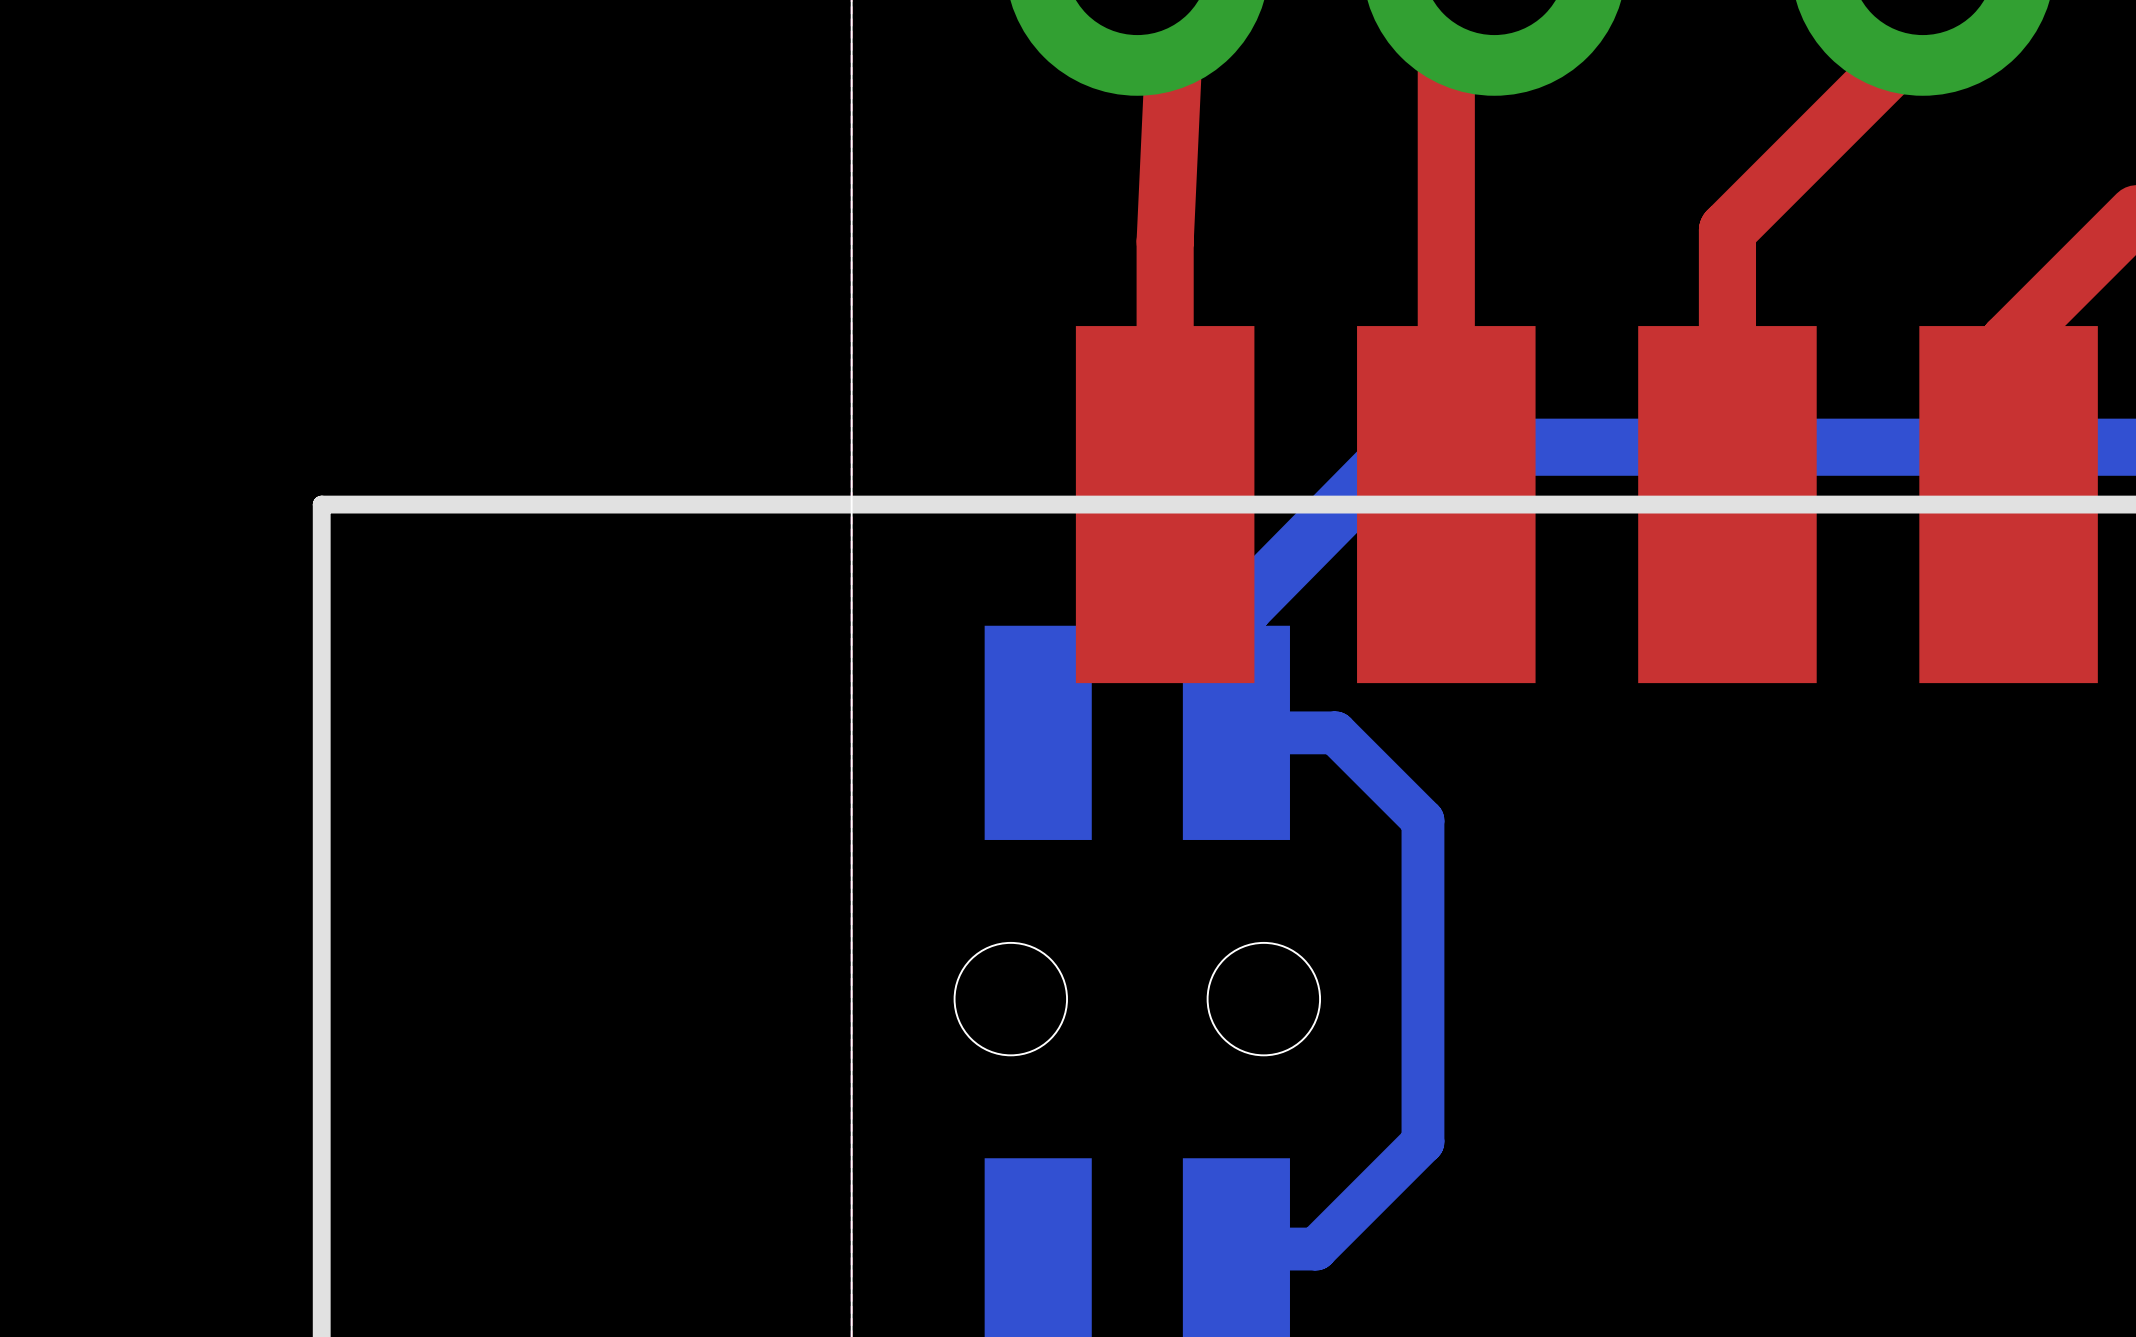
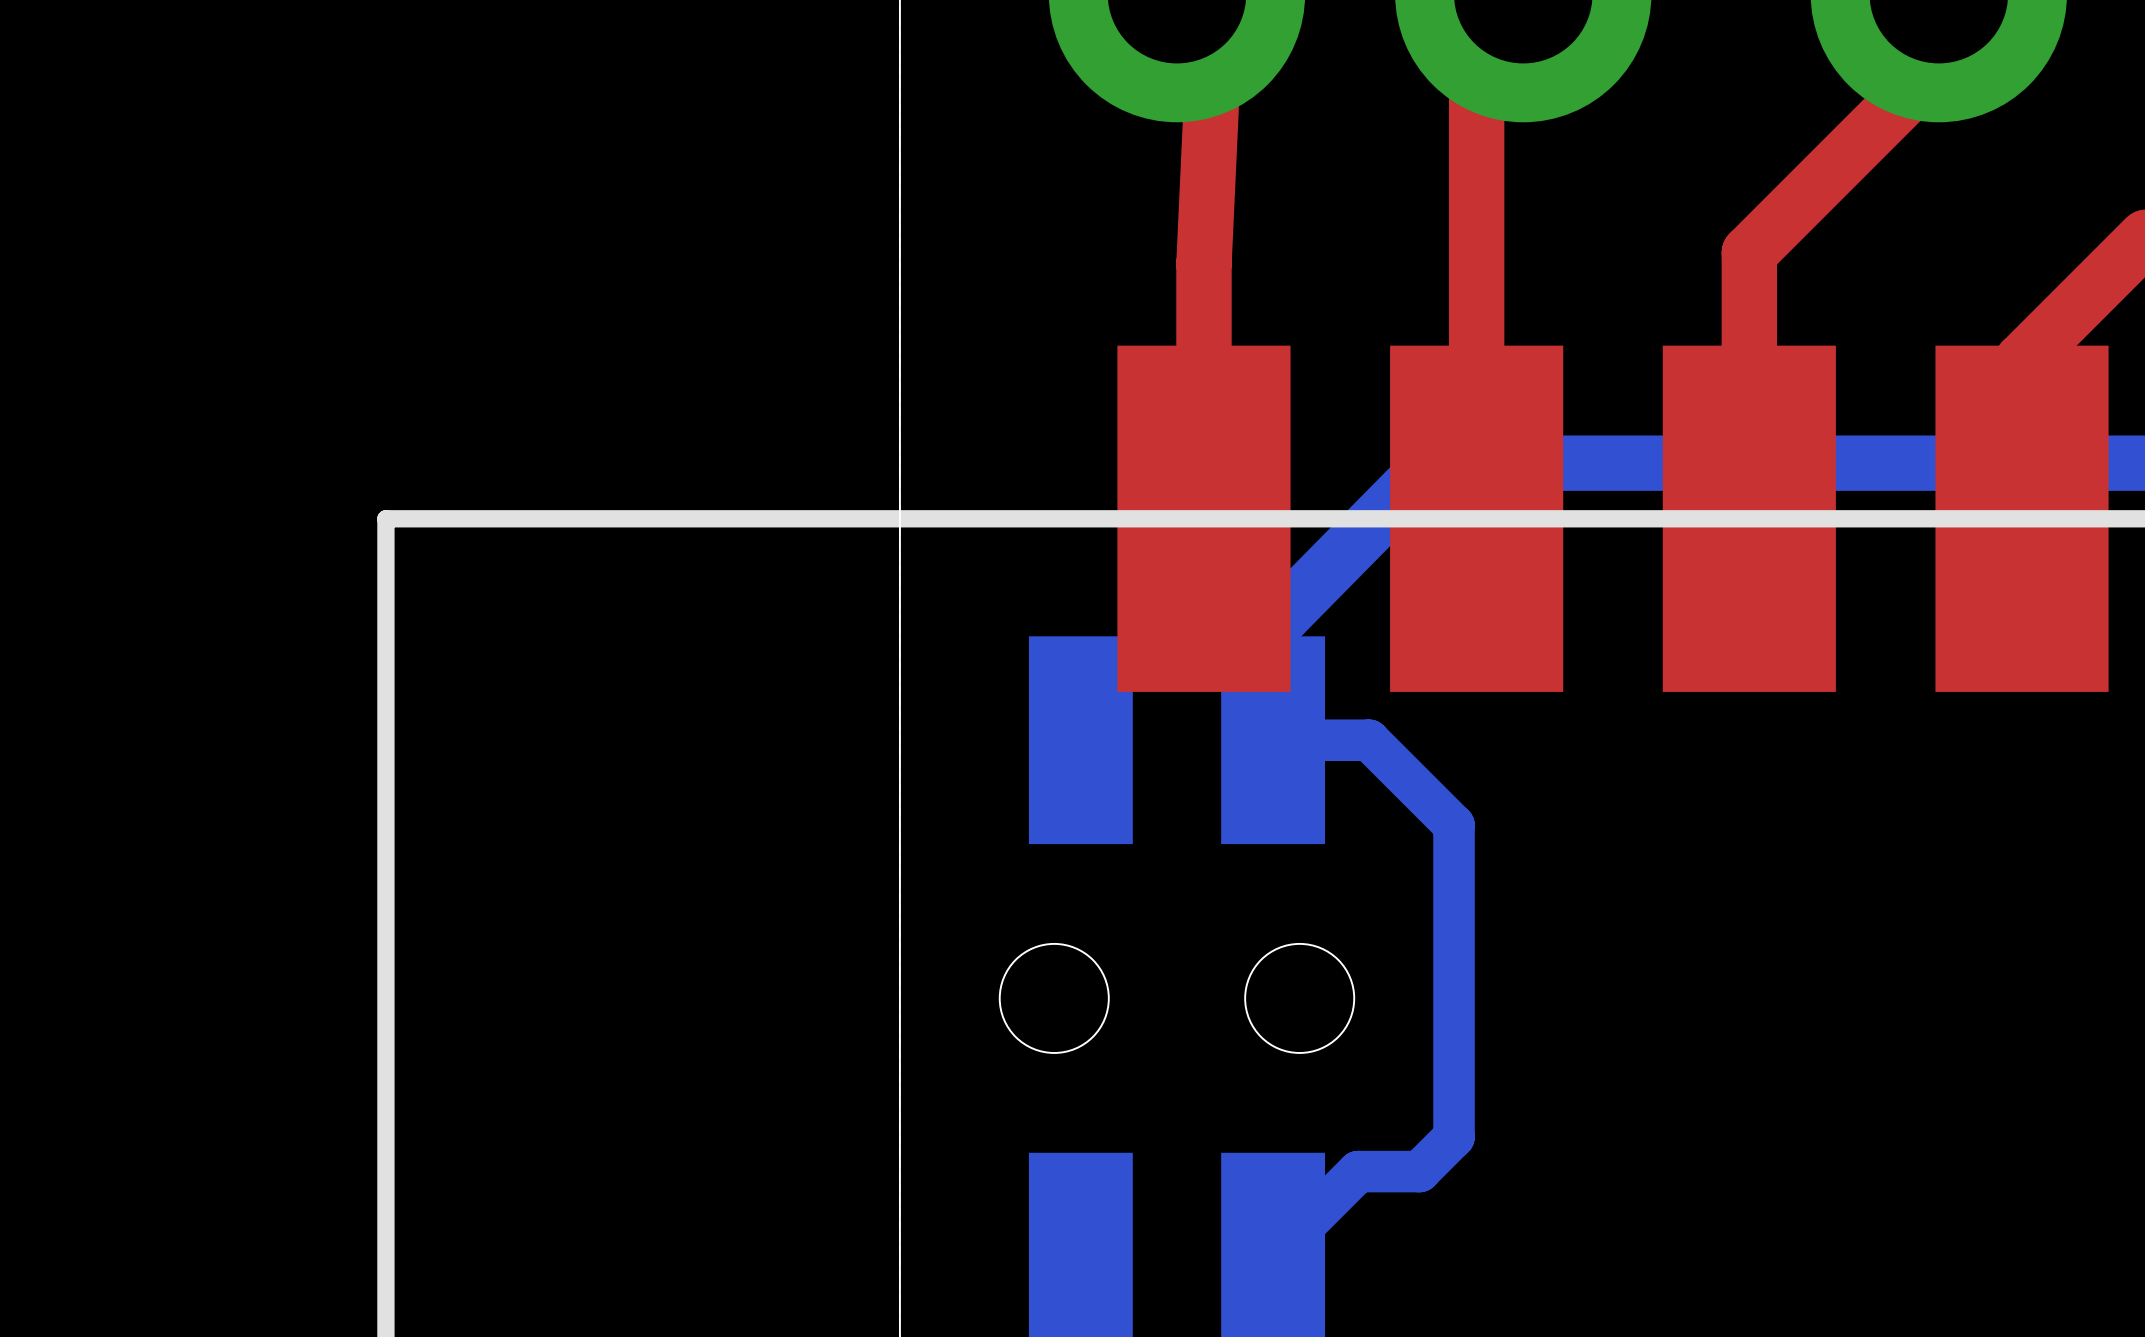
bottom track: (1387, 1177) (1315, 1249) (1252, 1249) -> (1419, 1171) (1358, 1171) (1288, 1240)

